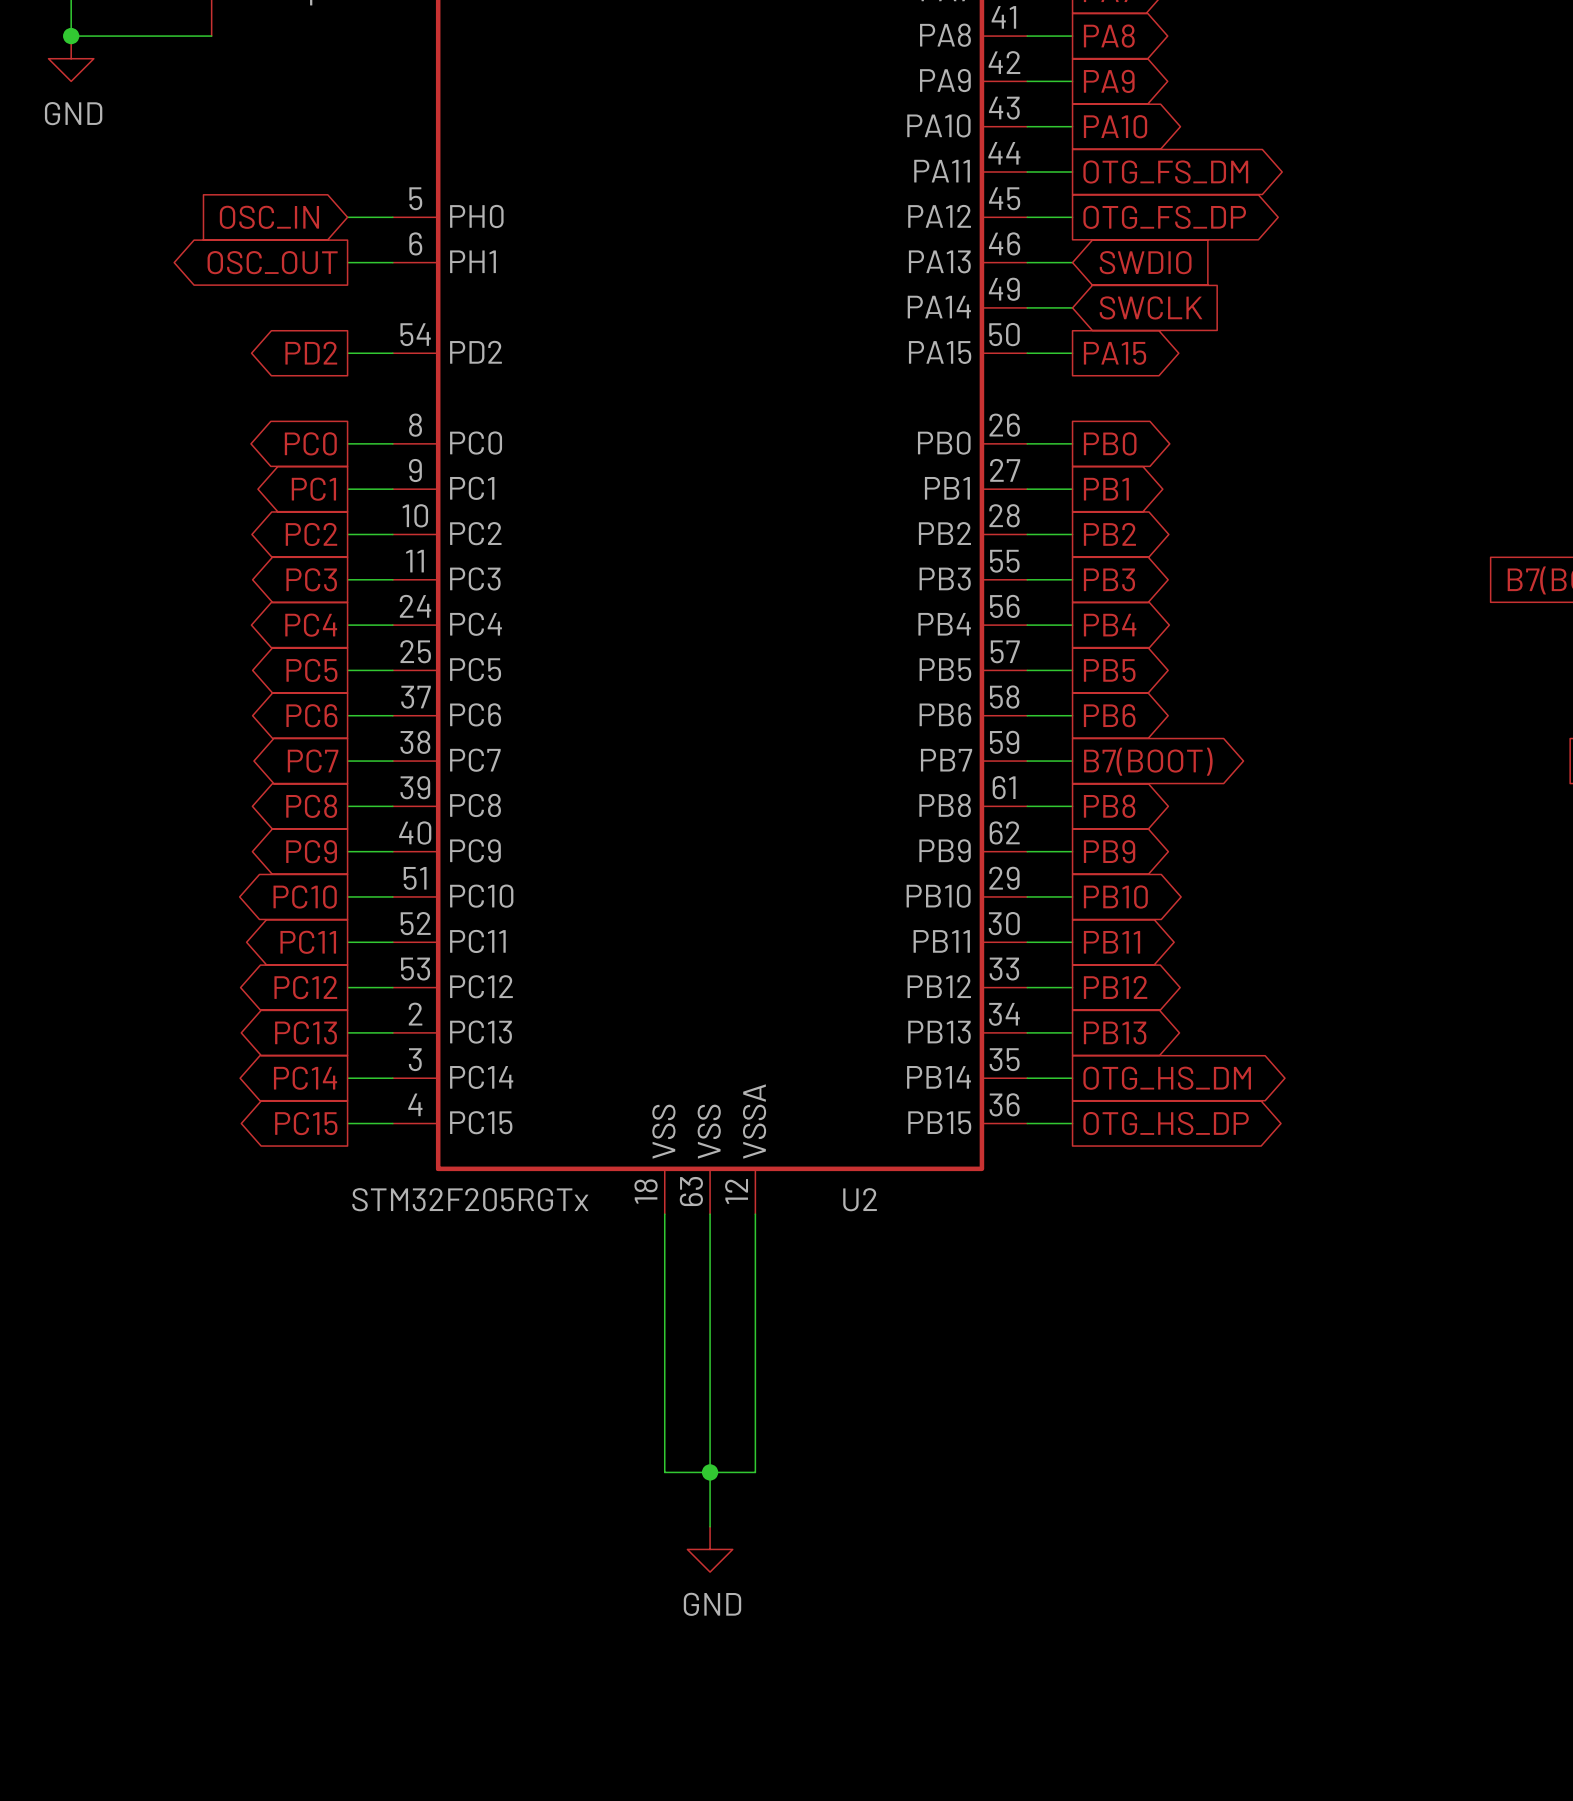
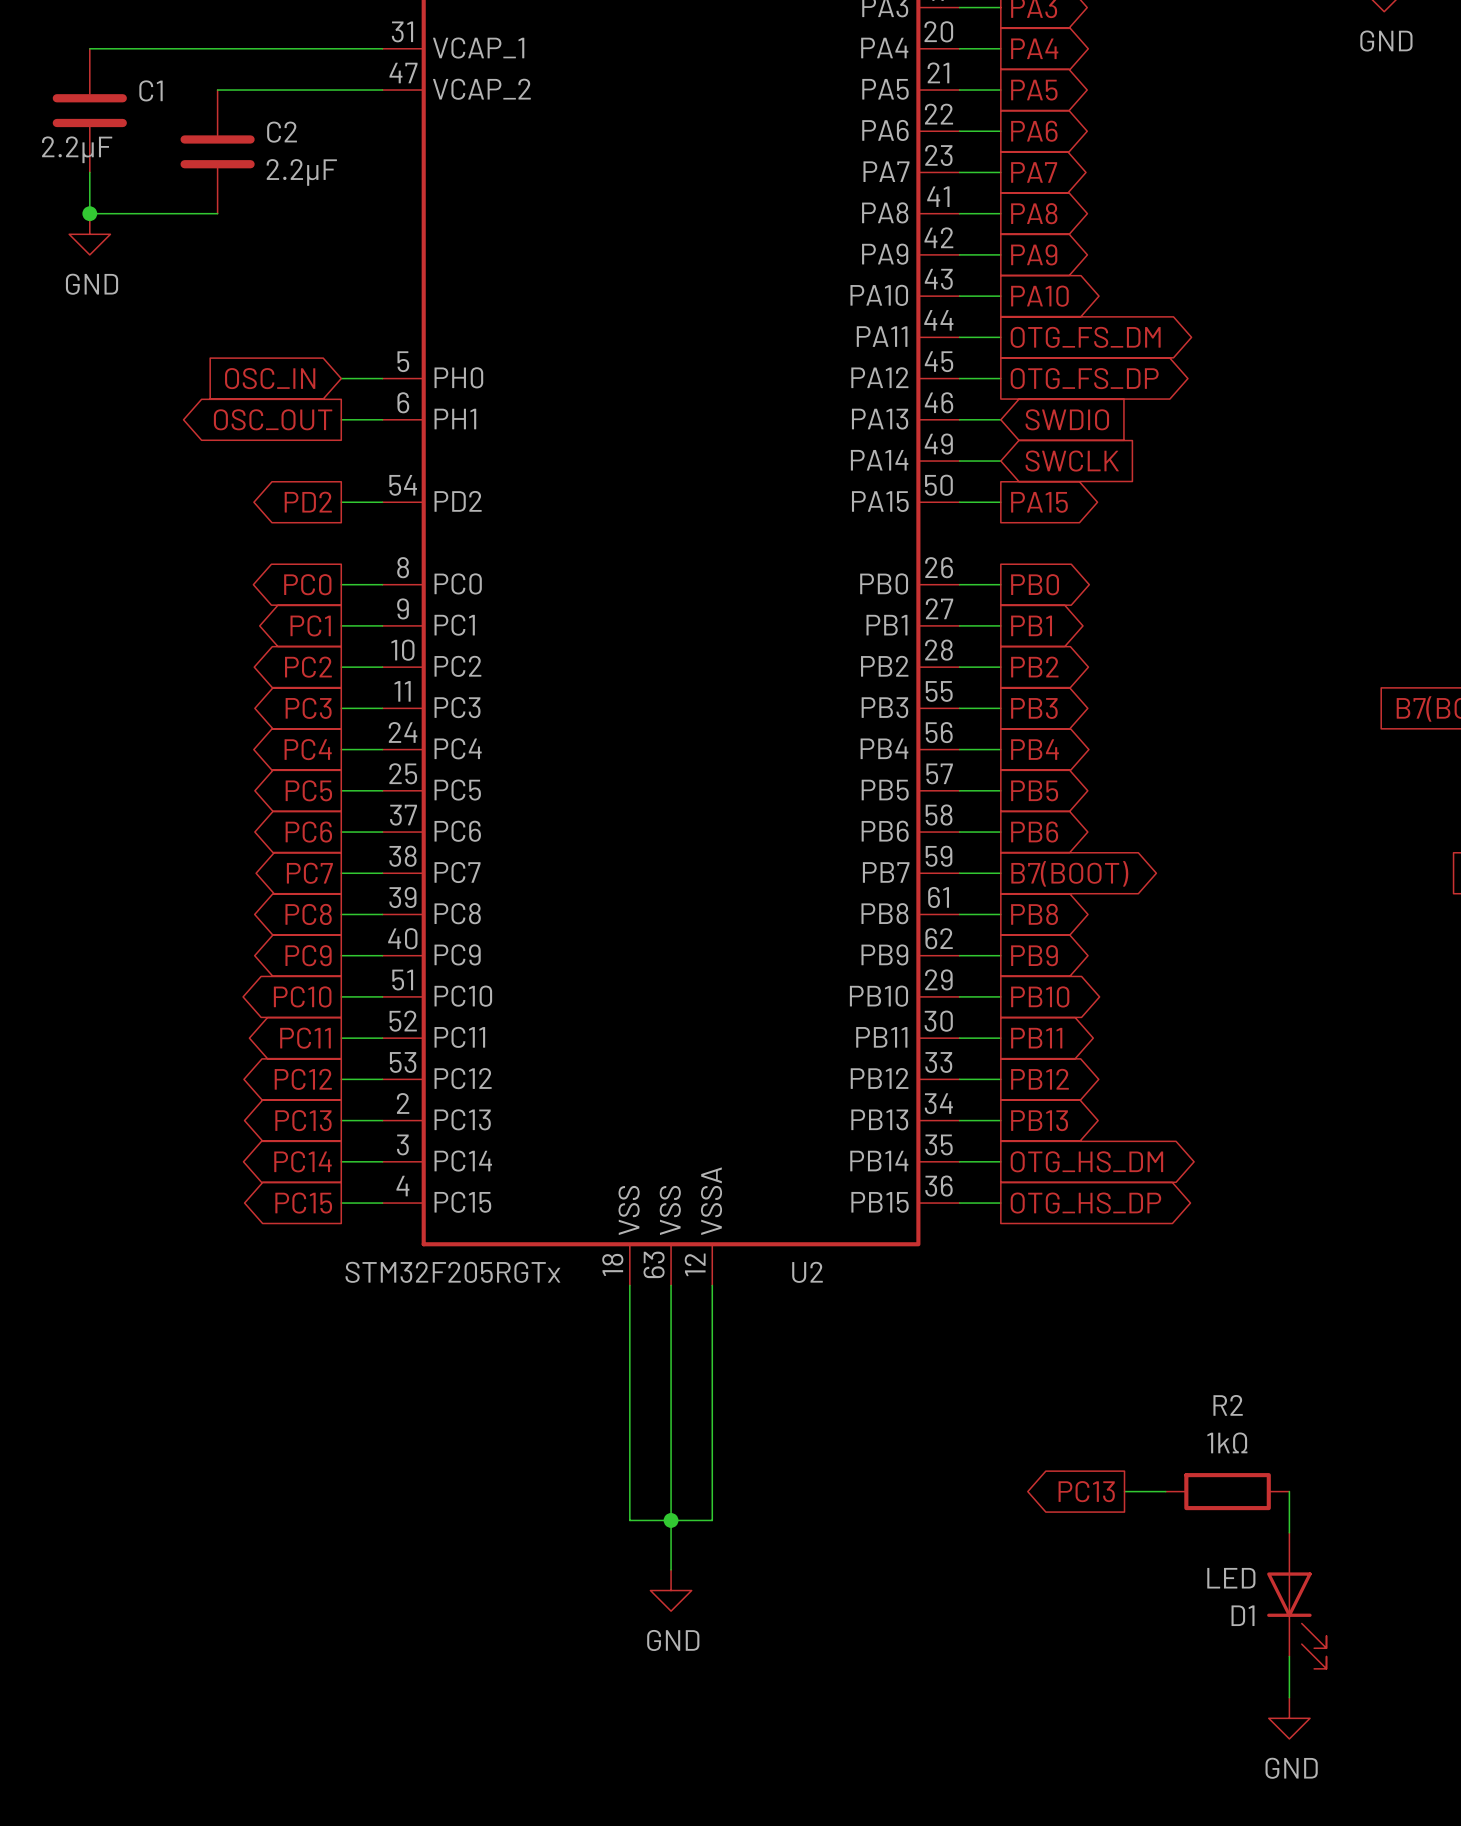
global label: none -> PC13 (1086, 1491)
wire: none -> (1124, 1491) (1165, 1491)
R2: none -> 1kΩ (1227, 1491)
wire: none -> (1289, 1491) (1289, 1532)
D1: none -> LED (1296, 1600)
wire: none -> (1289, 1656) (1289, 1697)
power symbol: none -> GND (1289, 1718)

